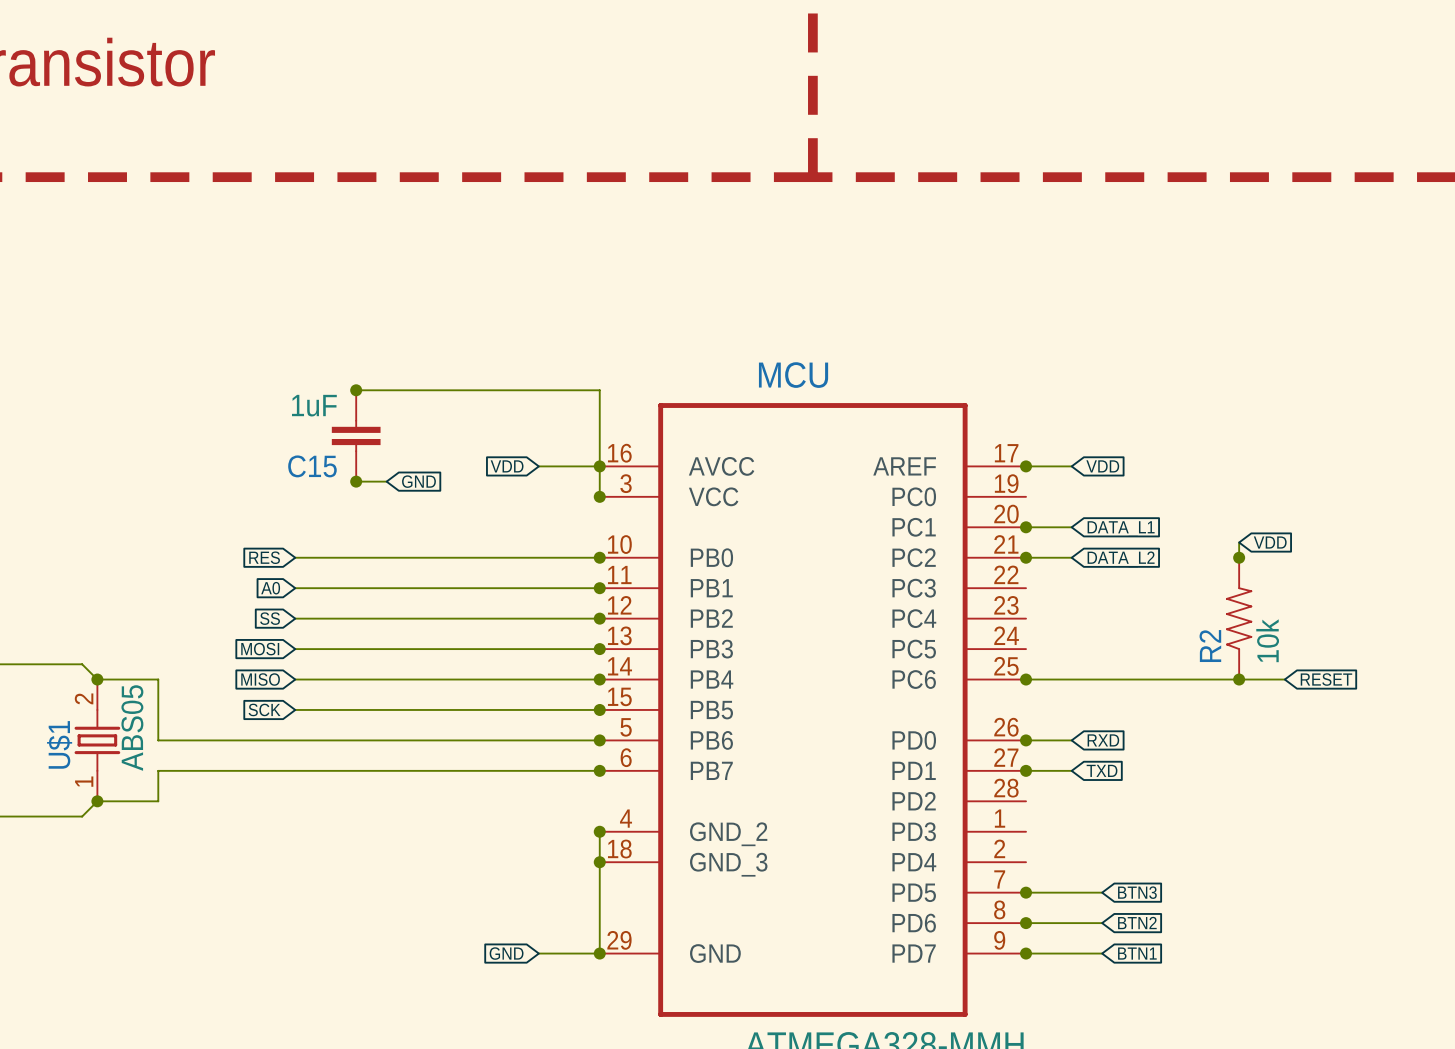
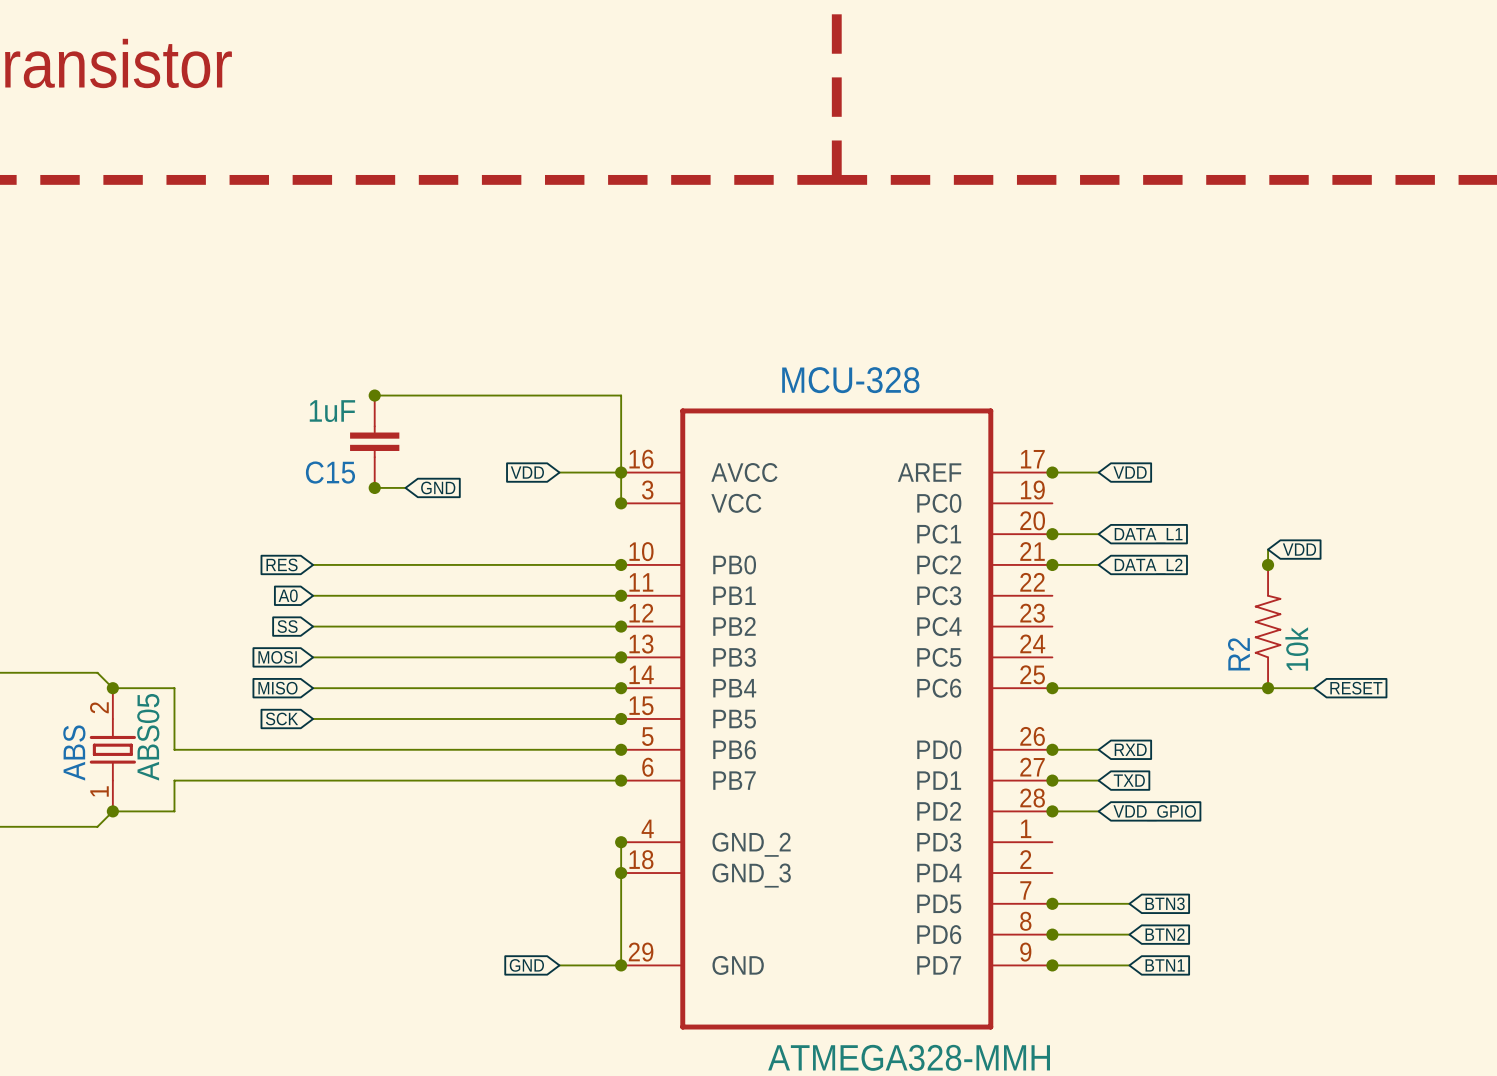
MCU name: MCU (793, 375) -> MCU-328 (850, 380)
U$1 name: U$1 (59, 744) -> ABS (74, 752)
wire: none -> (1052, 811) (1098, 811)
junction: none -> (1052, 811)
global label: none -> VDD_GPIO (1154, 813)

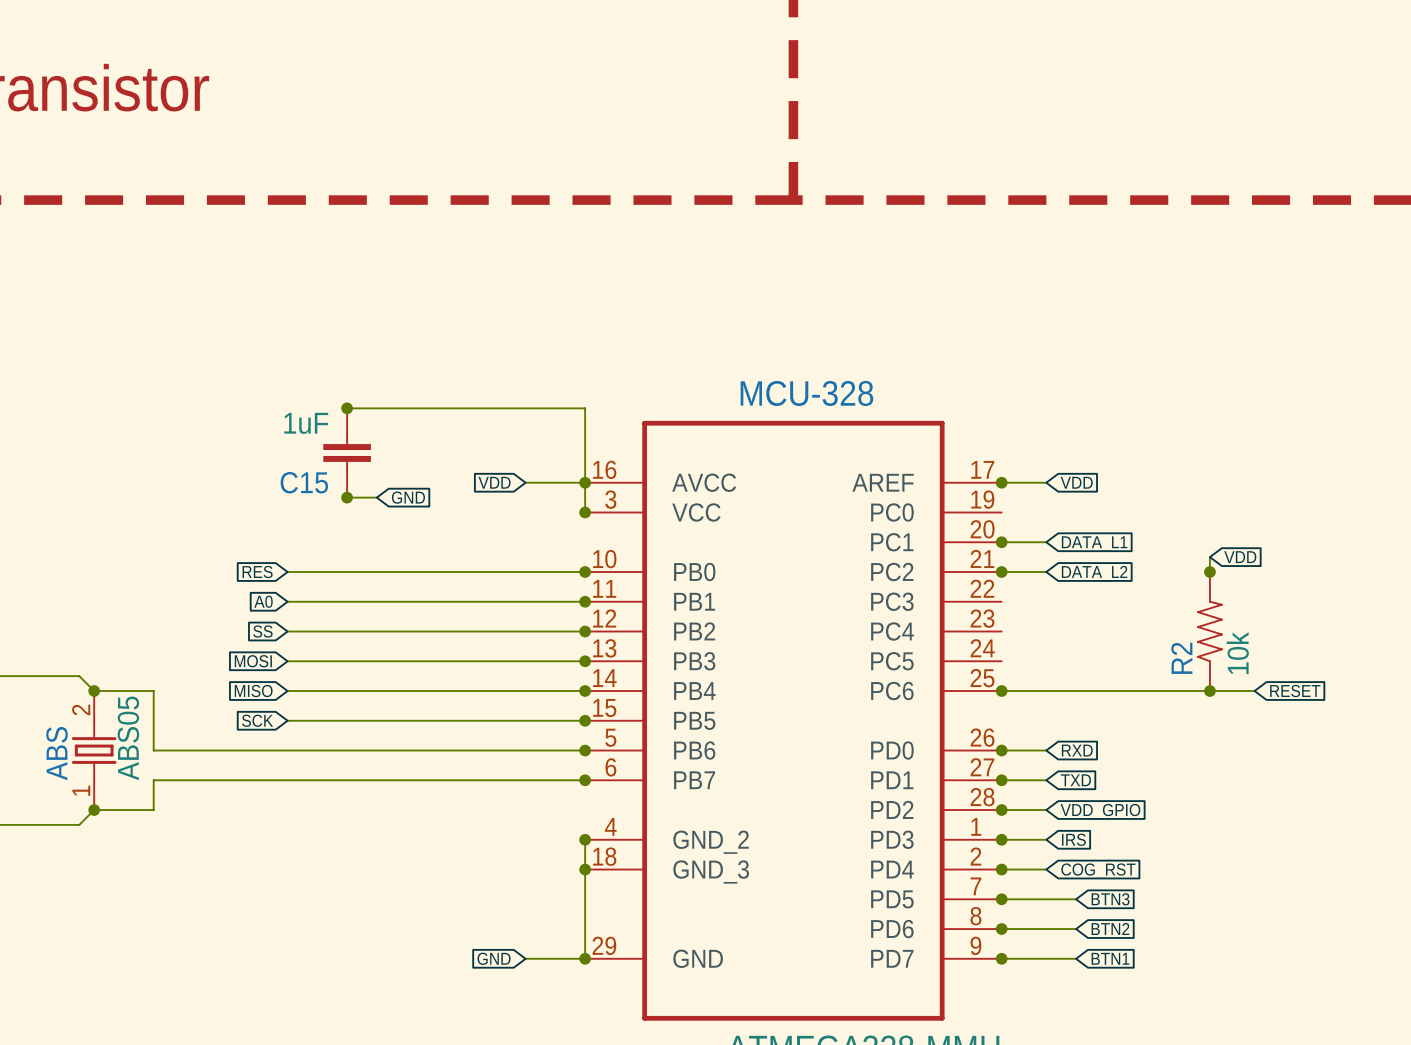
wire: none -> (1001, 839) (1046, 839)
junction: none -> (1001, 839)
global label: none -> IRS (1073, 839)
wire: none -> (1001, 869) (1046, 869)
junction: none -> (1001, 869)
global label: none -> COG_RST (1098, 871)

